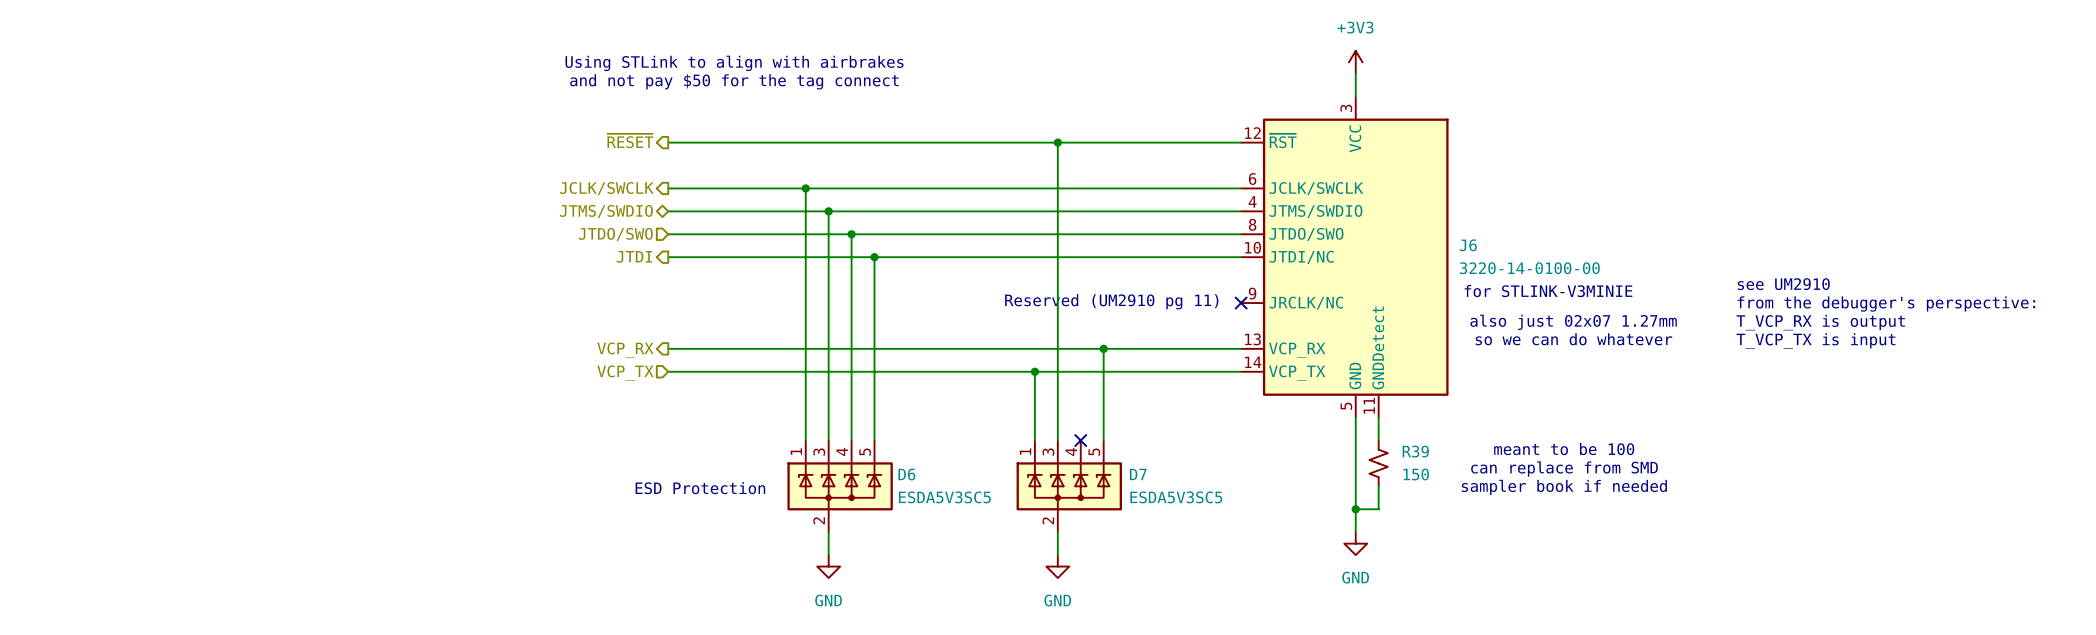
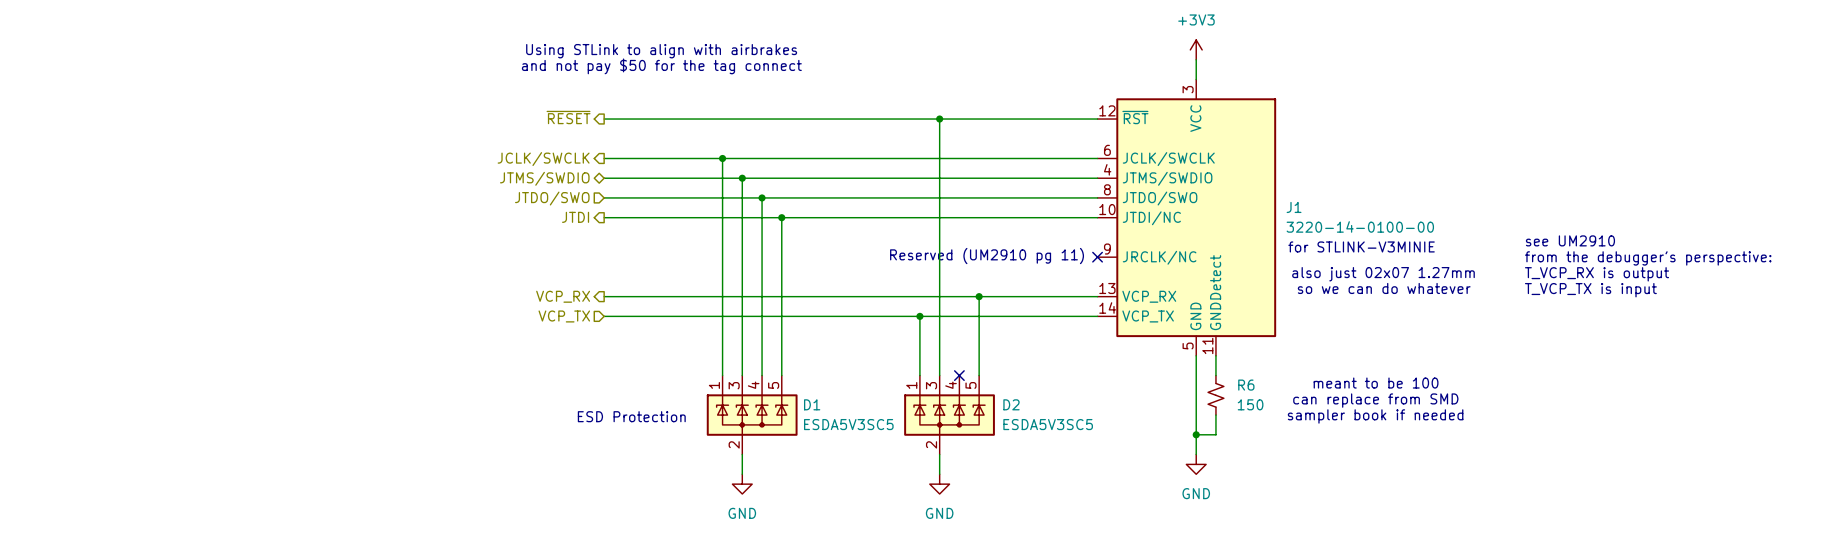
J6 name: J6 (1468, 245) -> J1 (1294, 207)
R39 name: R39 (1415, 451) -> R6 (1246, 385)
D6 name: D6 (906, 474) -> D1 (812, 404)
D7 name: D7 (1138, 474) -> D2 (1011, 404)

